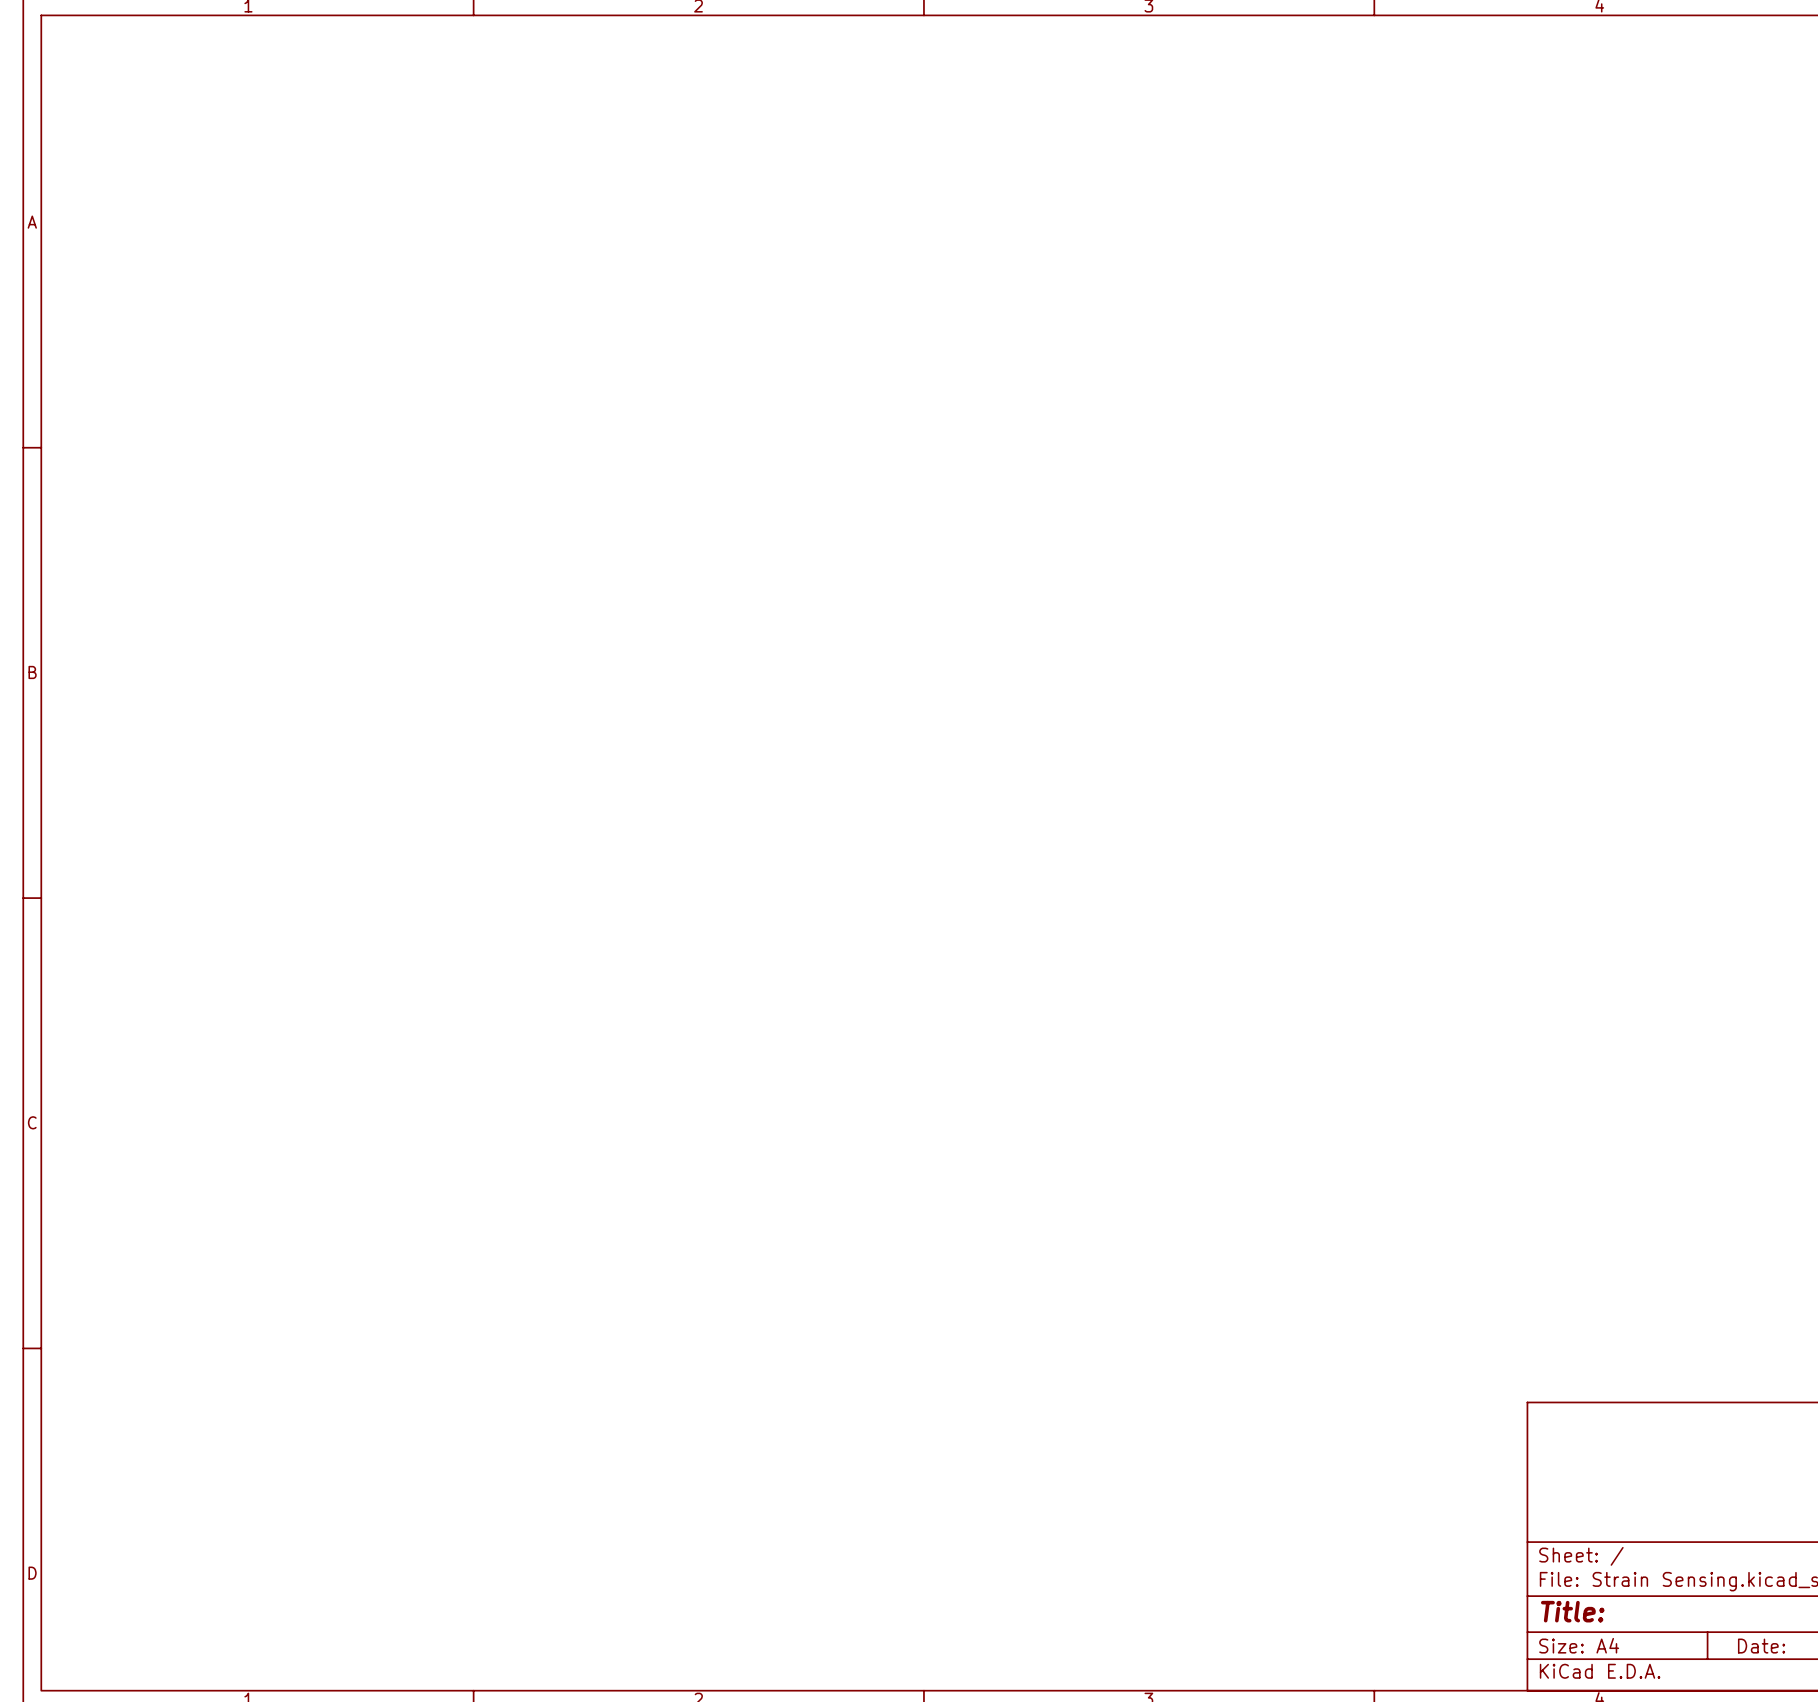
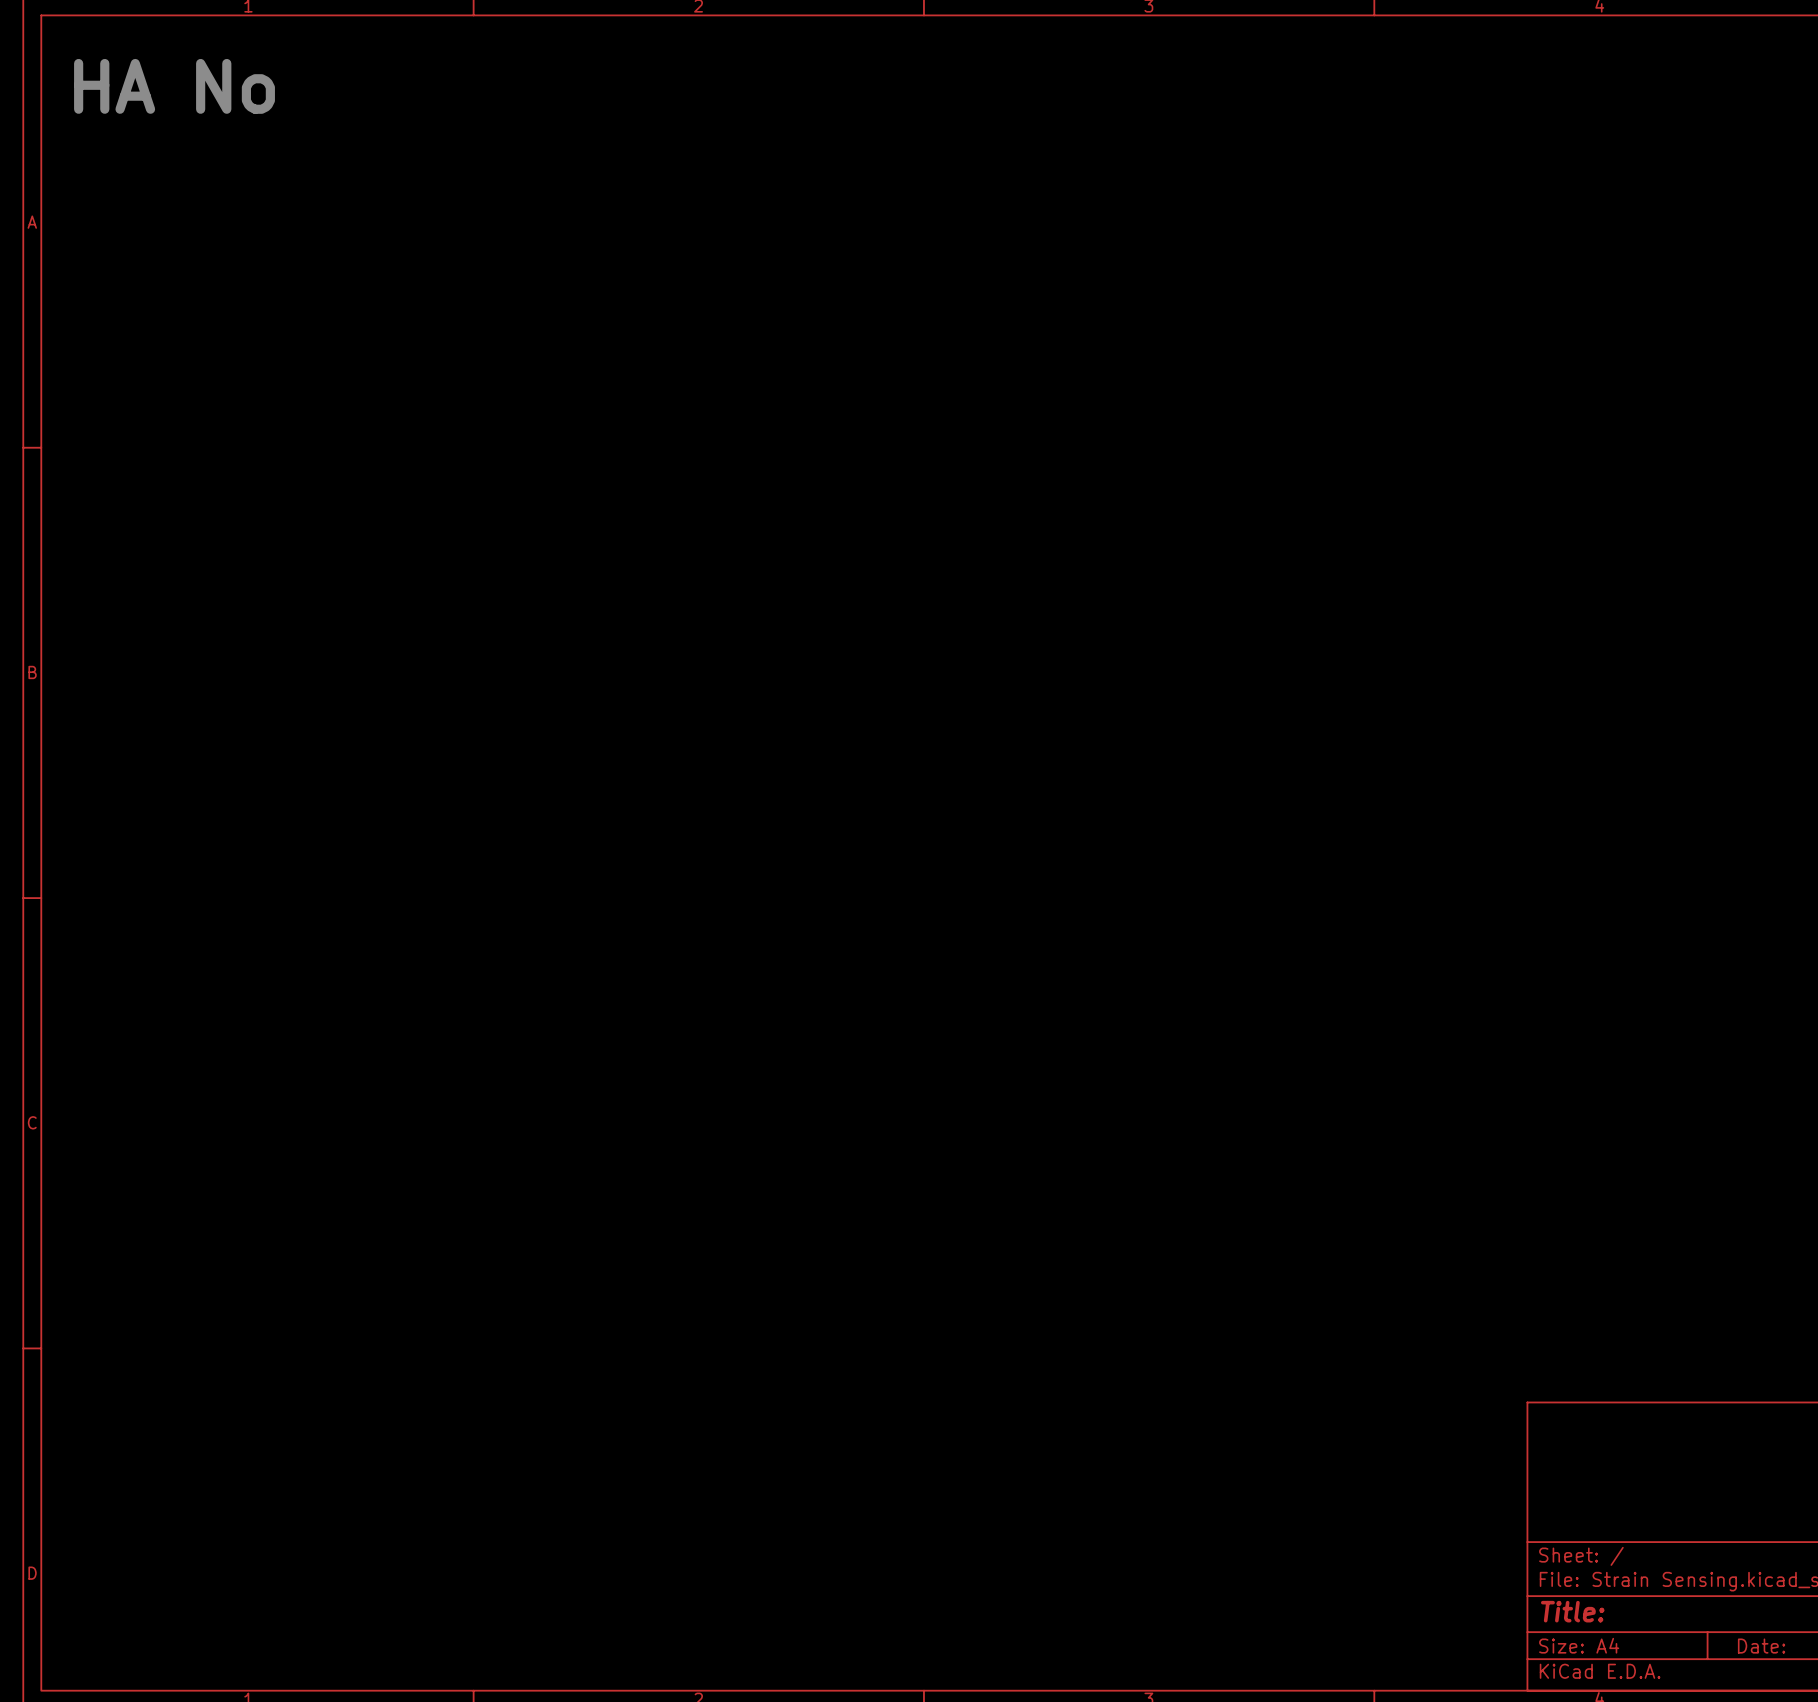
text: none -> HA No (174, 86)

